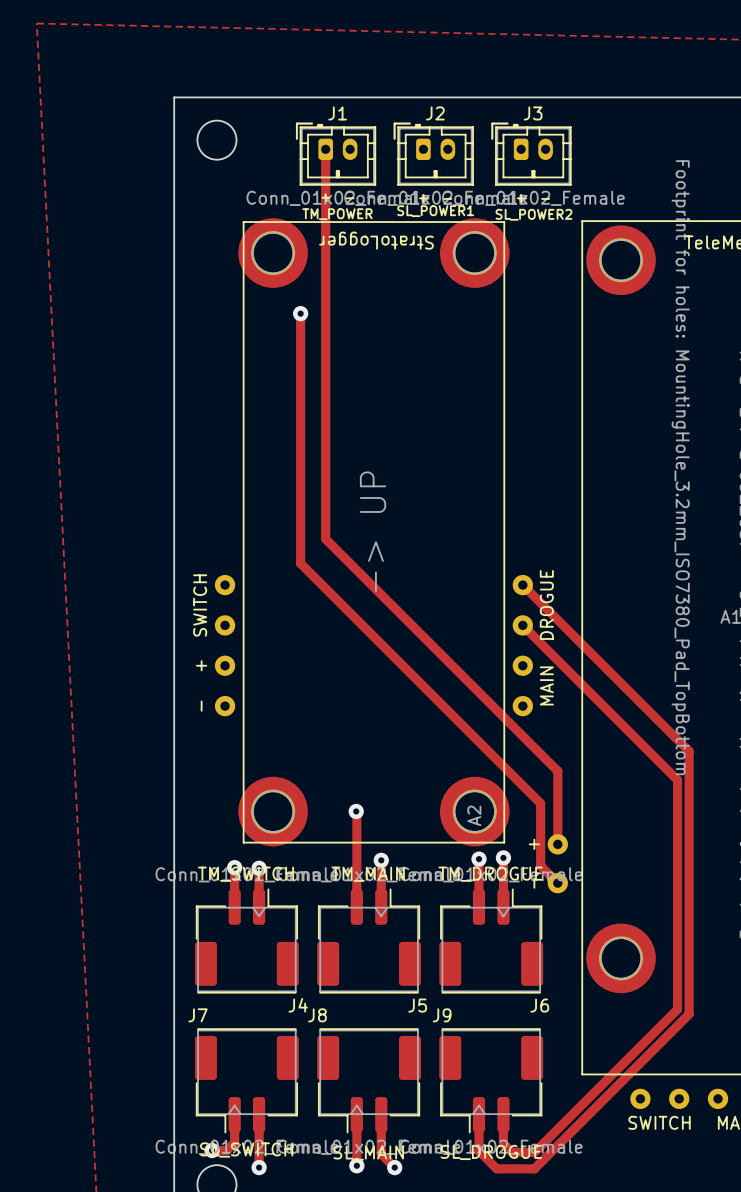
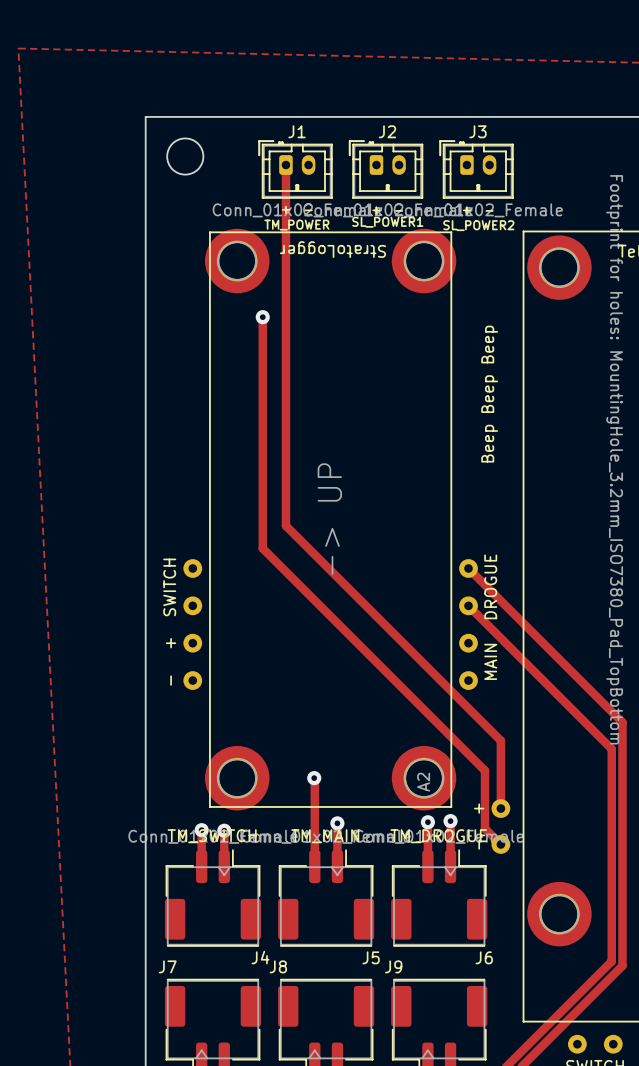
text: none -> Beep Beep Beep (489, 394)

